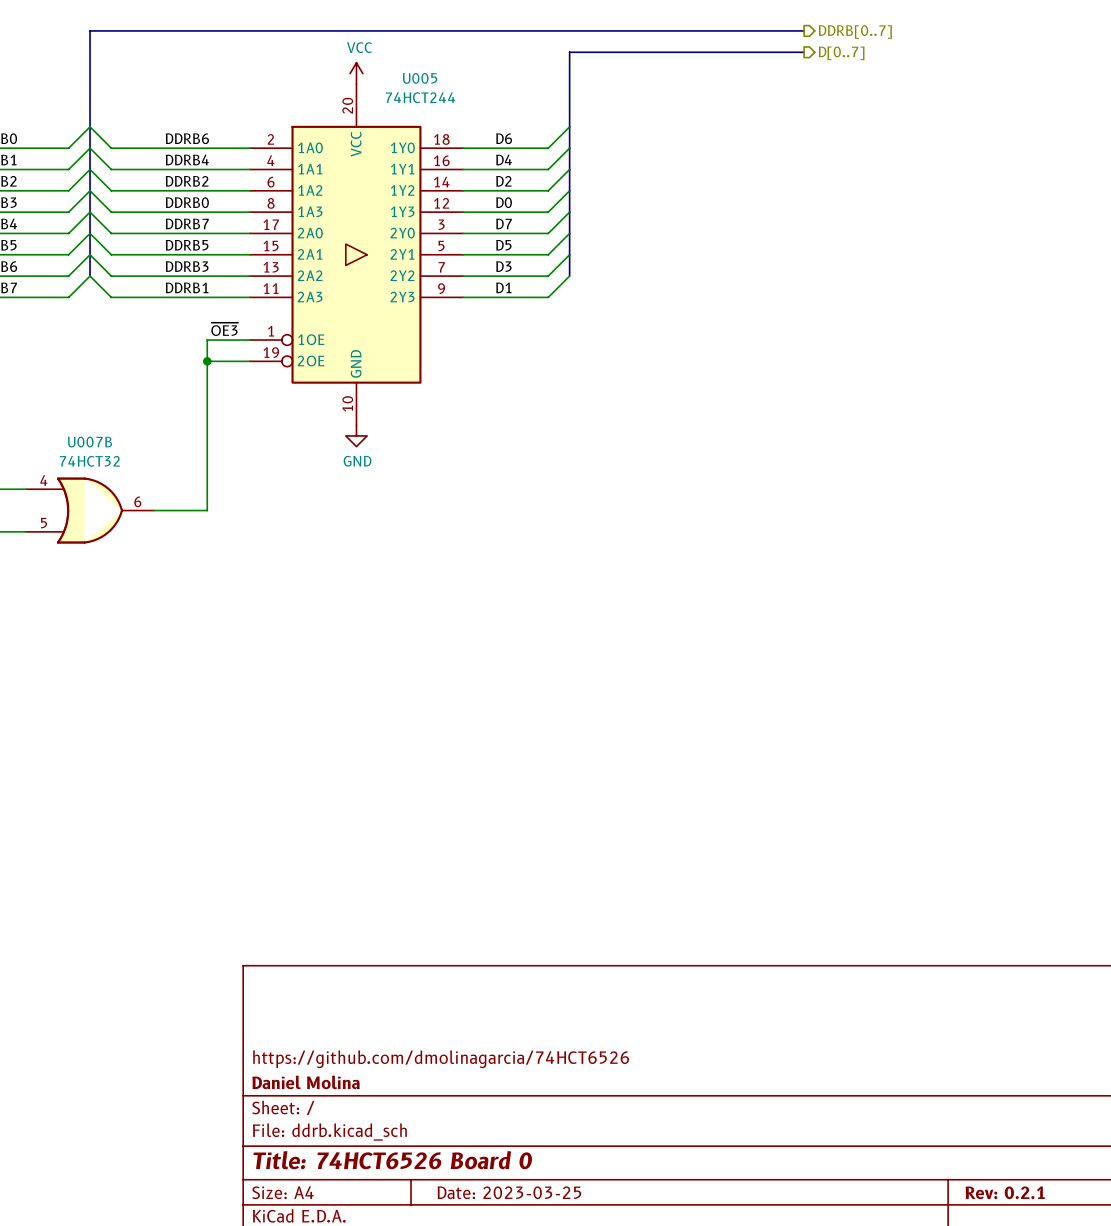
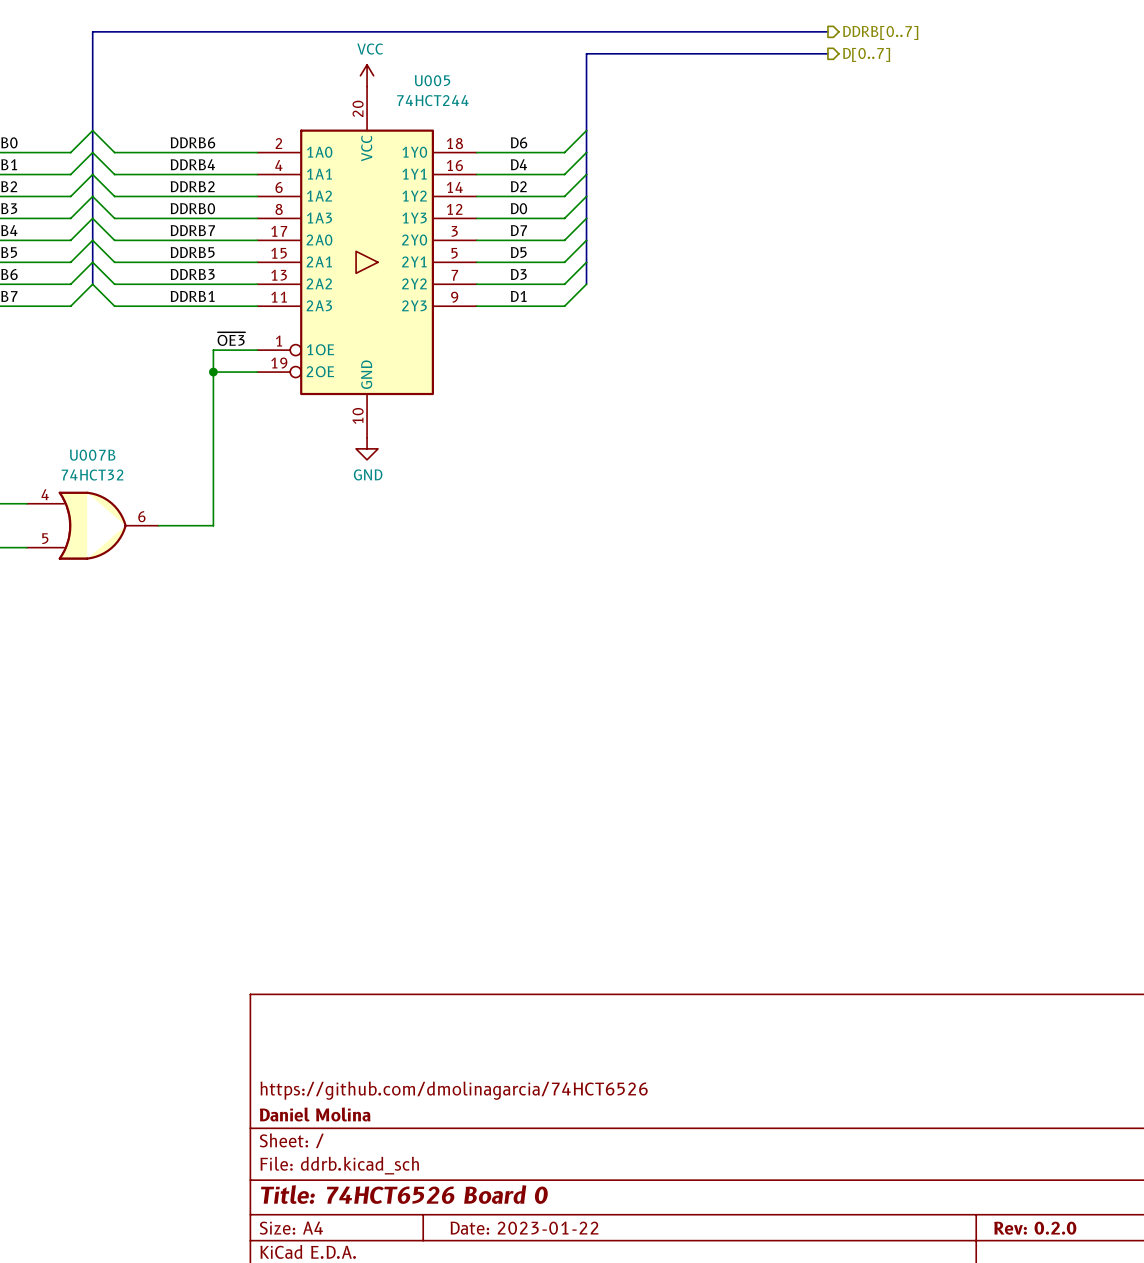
title block: Date: 2023-03-25 (509, 1192) -> Date: 2023-01-22 (524, 1228)
title block: Rev: 0.2.1 (1005, 1192) -> Rev: 0.2.0 (1035, 1228)

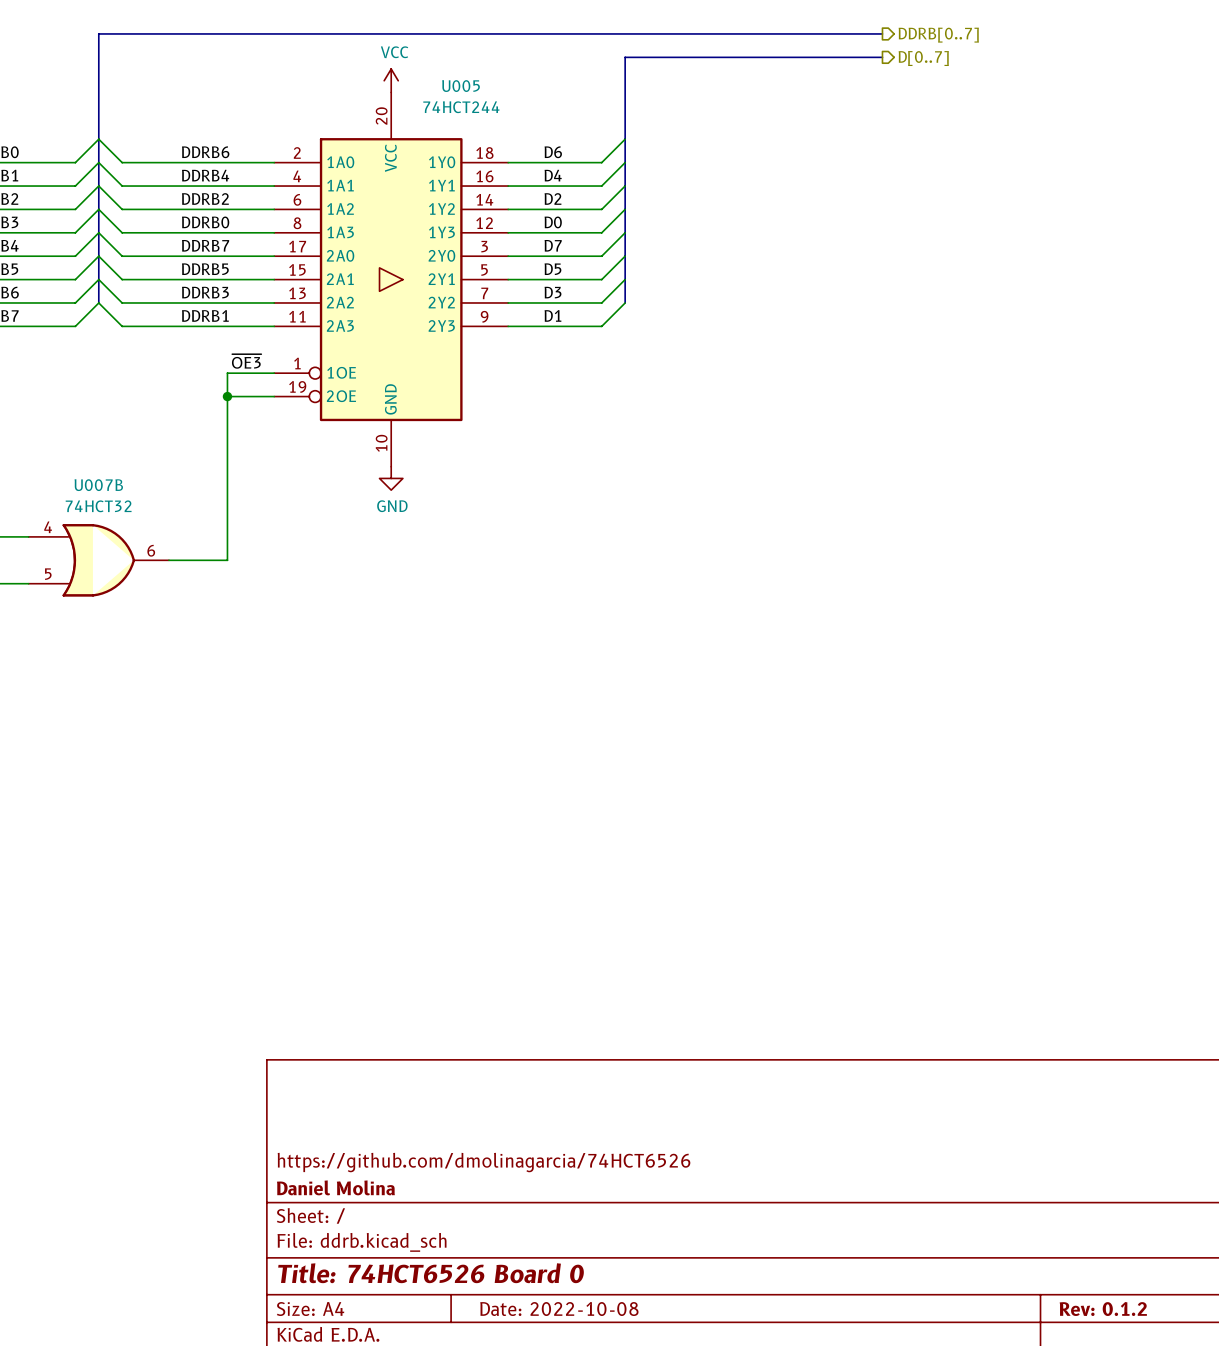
title block: Date: 2023-01-22 (524, 1228) -> Date: 2022-10-08 (559, 1309)
title block: Rev: 0.2.0 (1035, 1228) -> Rev: 0.1.2 (1103, 1309)

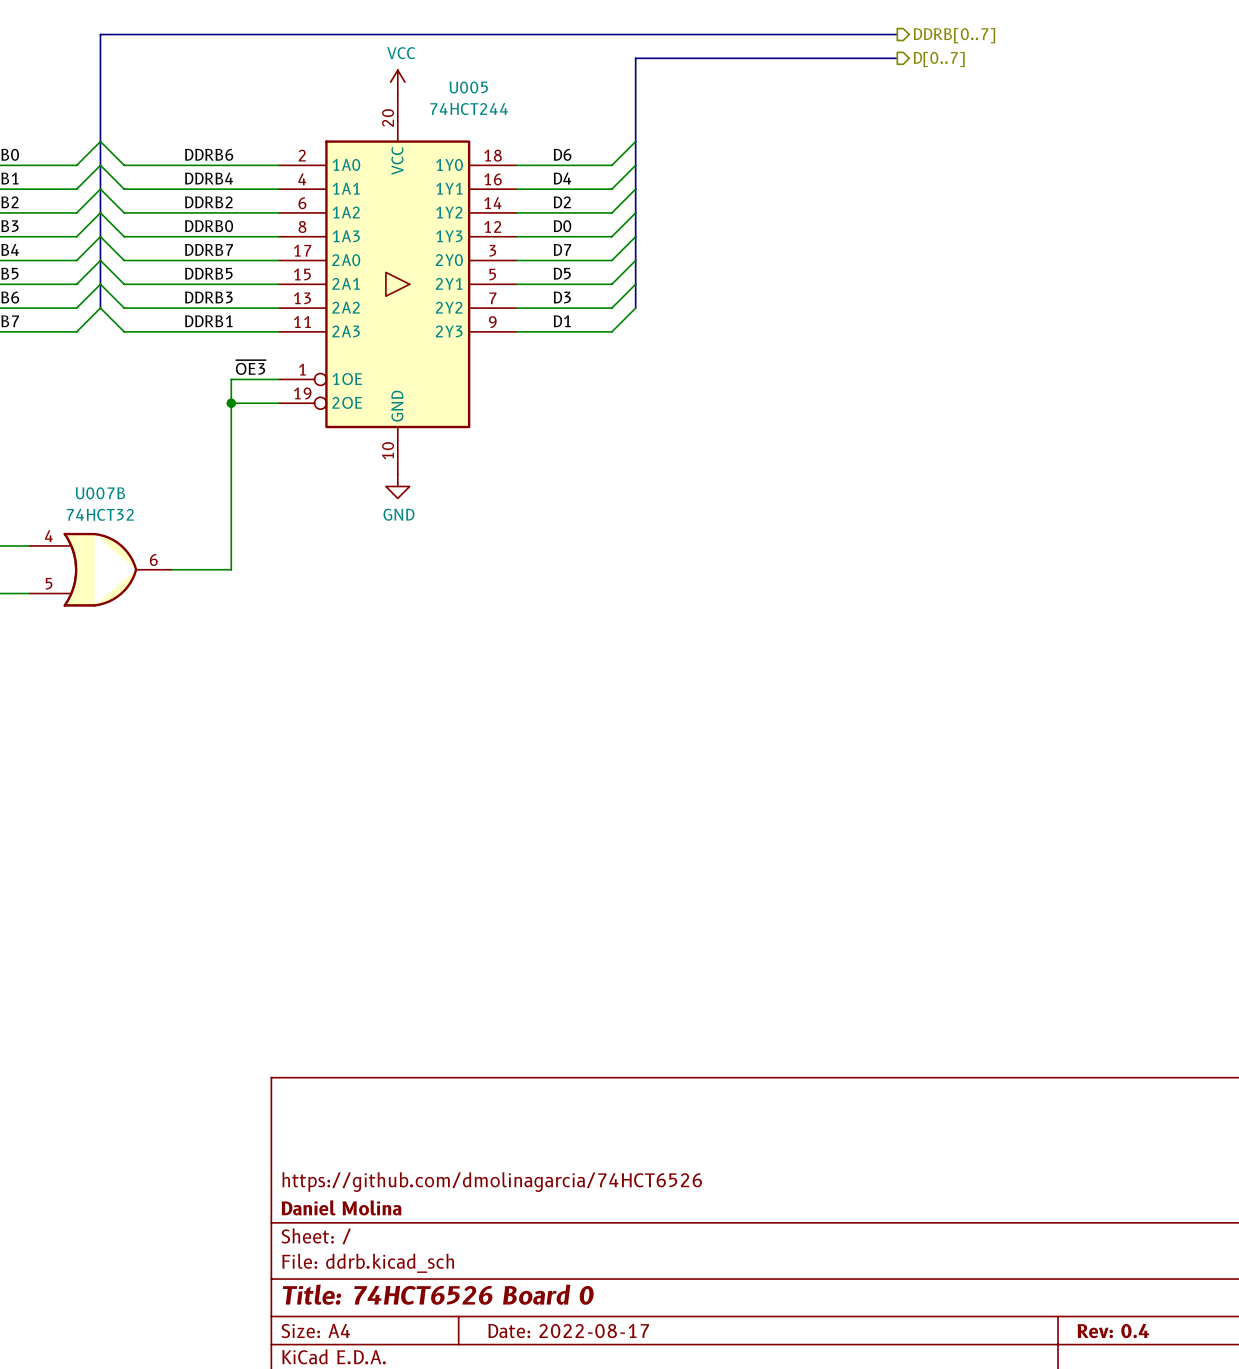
title block: Date: 2022-10-08 (559, 1309) -> Date: 2022-08-17 (568, 1331)
title block: Rev: 0.1.2 (1103, 1309) -> Rev: 0.4 (1113, 1331)

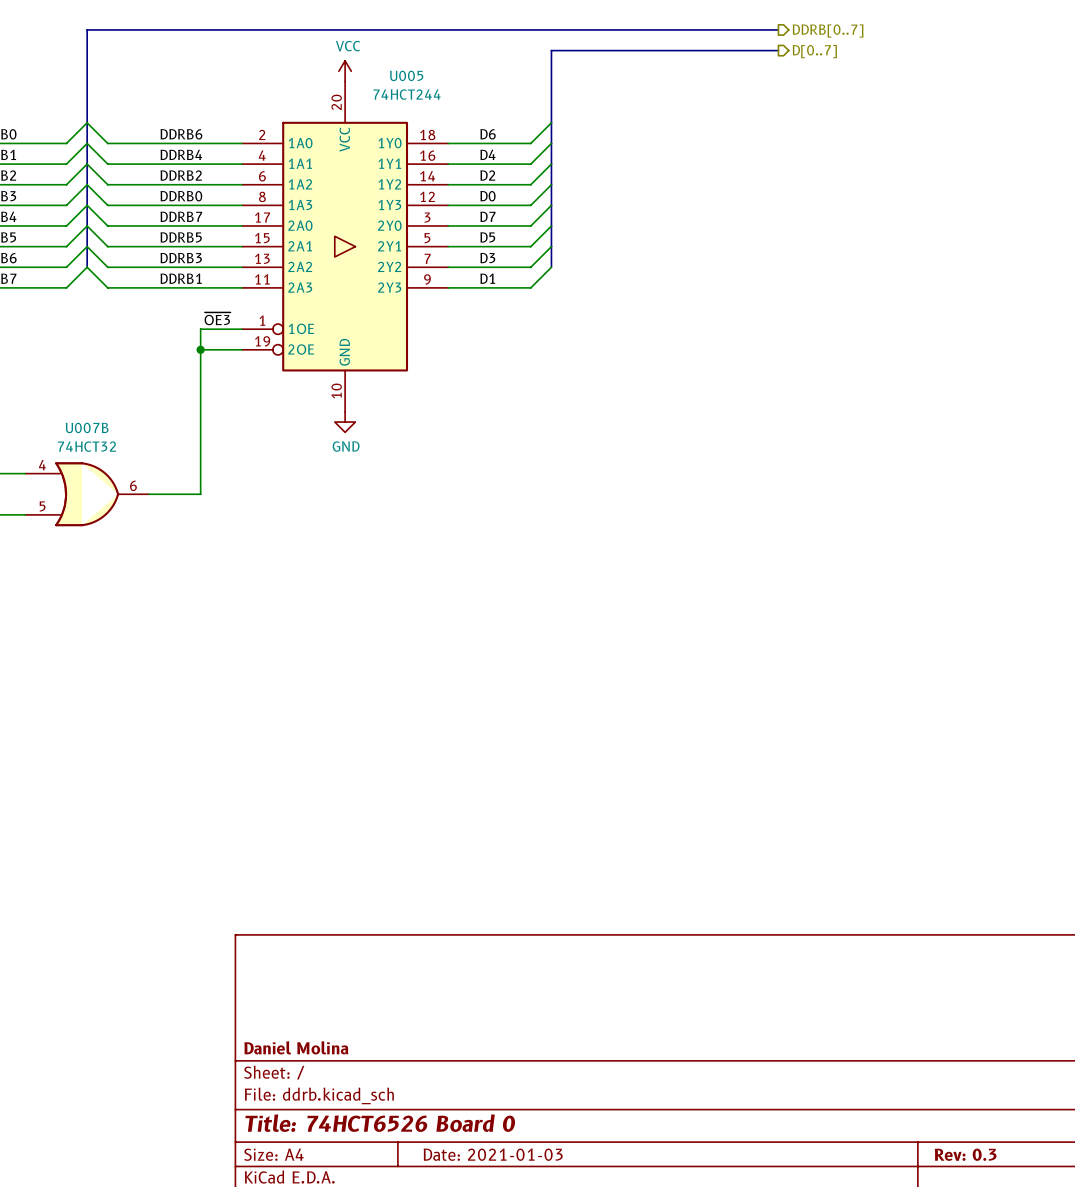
title block: https://github.com/dmolinagarcia/74HCT6526 (492, 1182) -> none
title block: Date: 2022-08-17 (568, 1331) -> Date: 2021-01-03 (493, 1154)
title block: Rev: 0.4 (1113, 1331) -> Rev: 0.3 (965, 1154)

